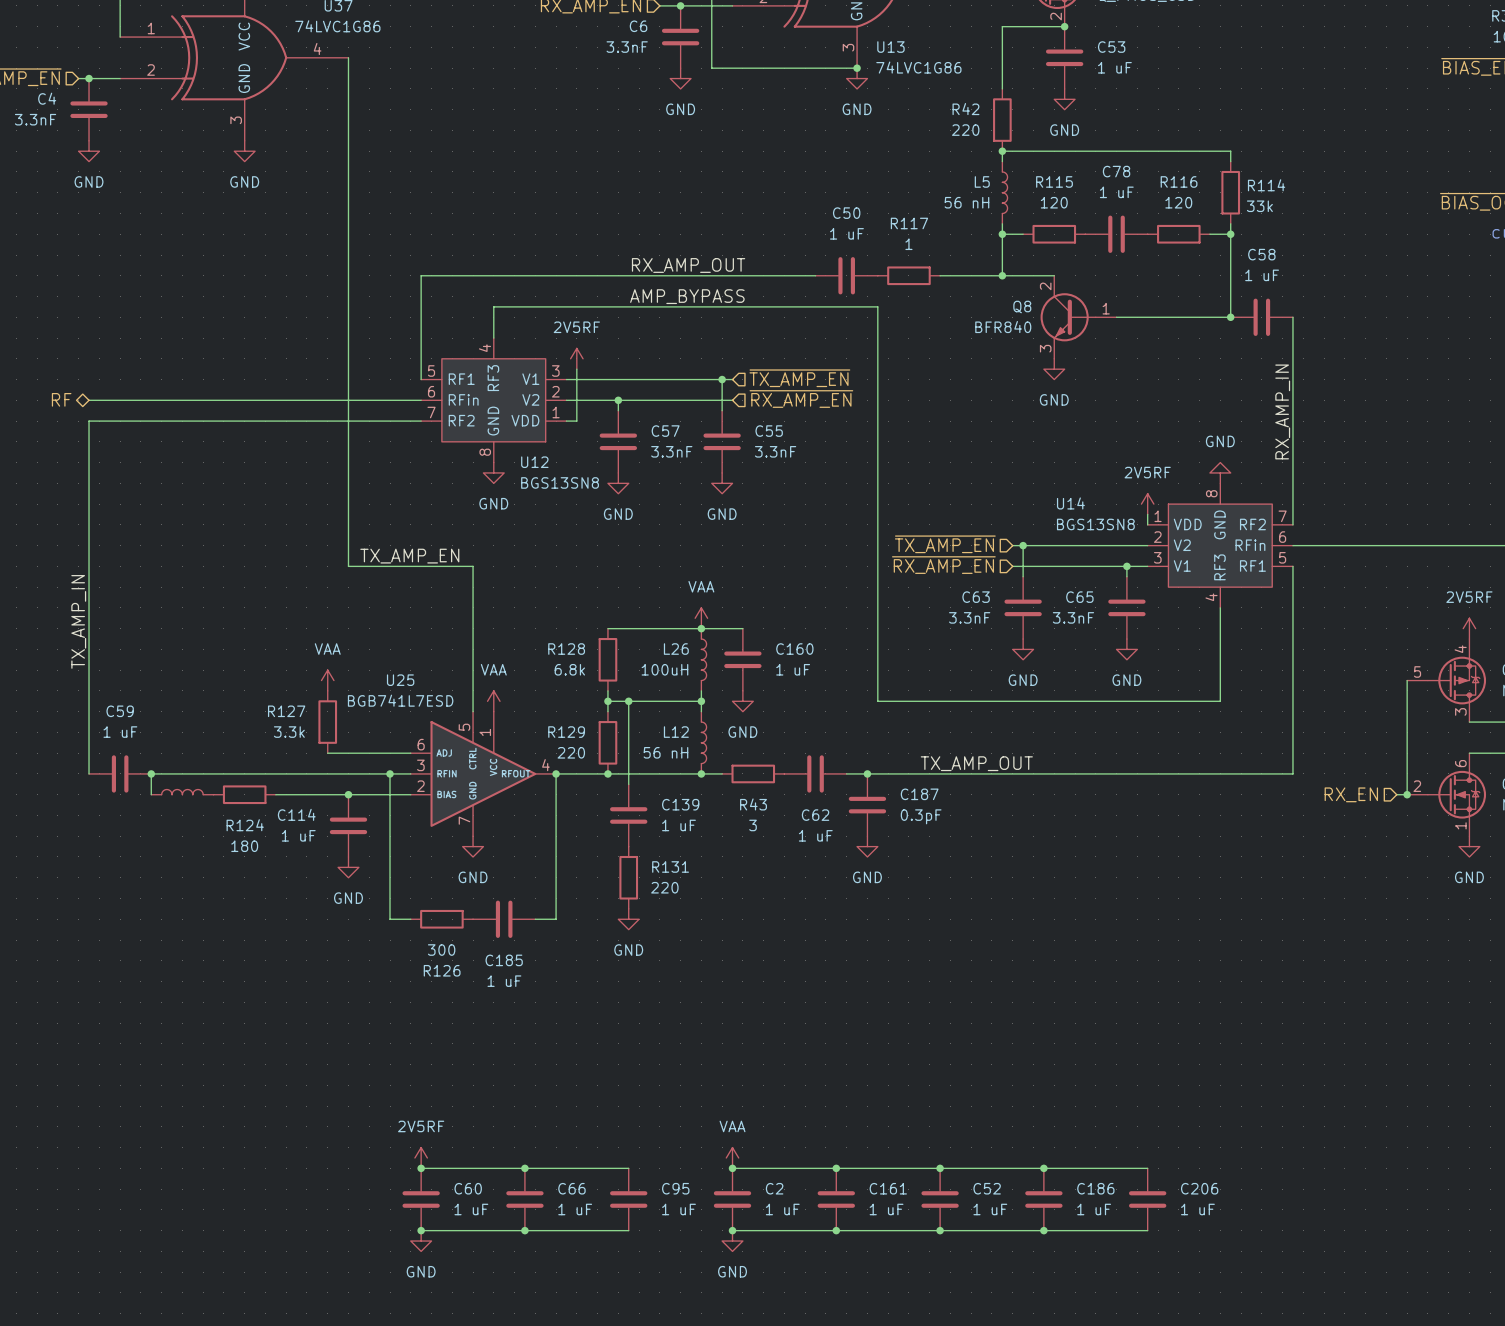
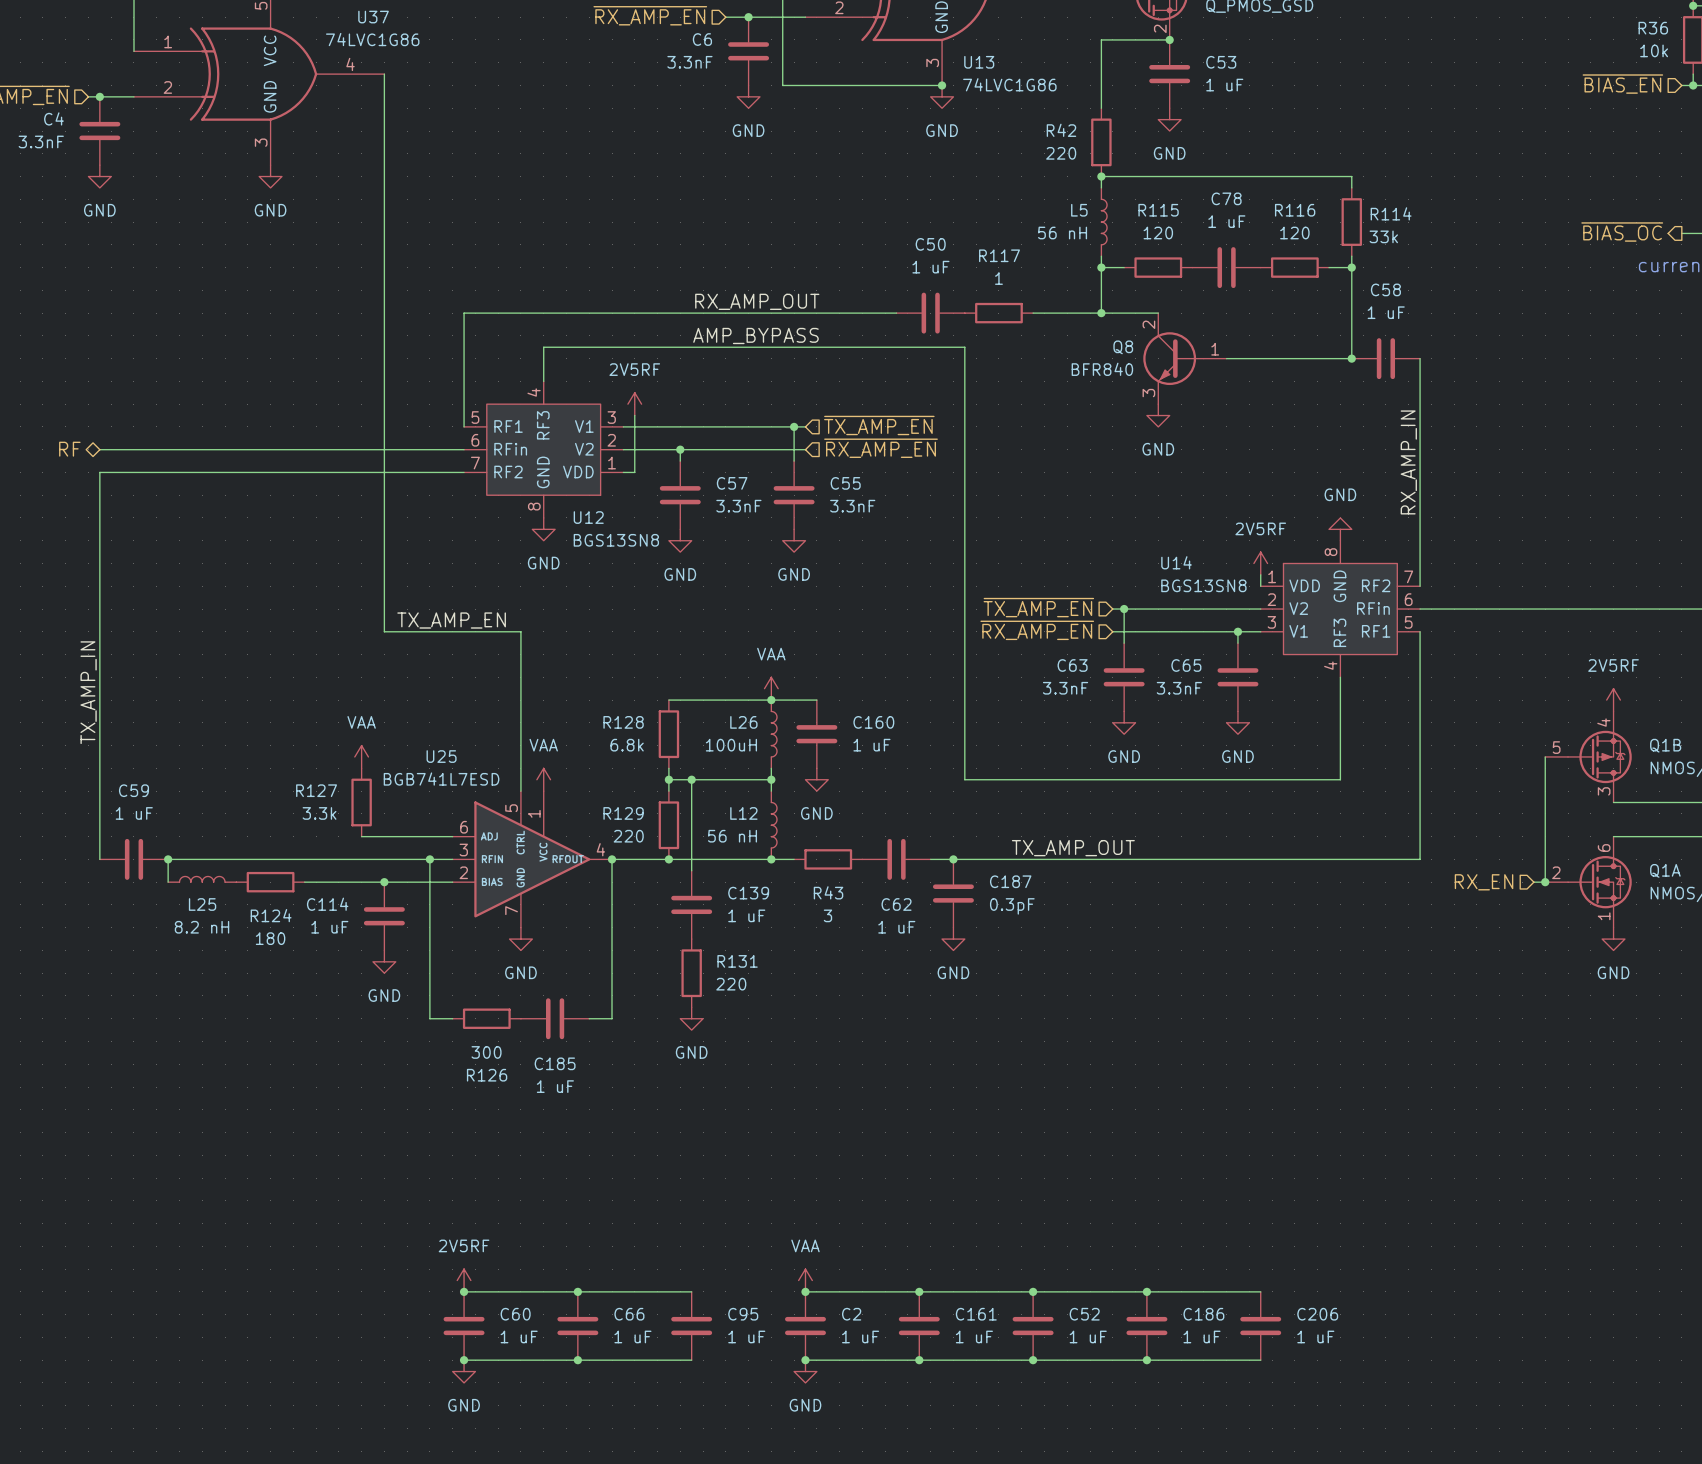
L25 name: none -> L25 (202, 904)
L25 value: none -> 8.2 nH (202, 927)

